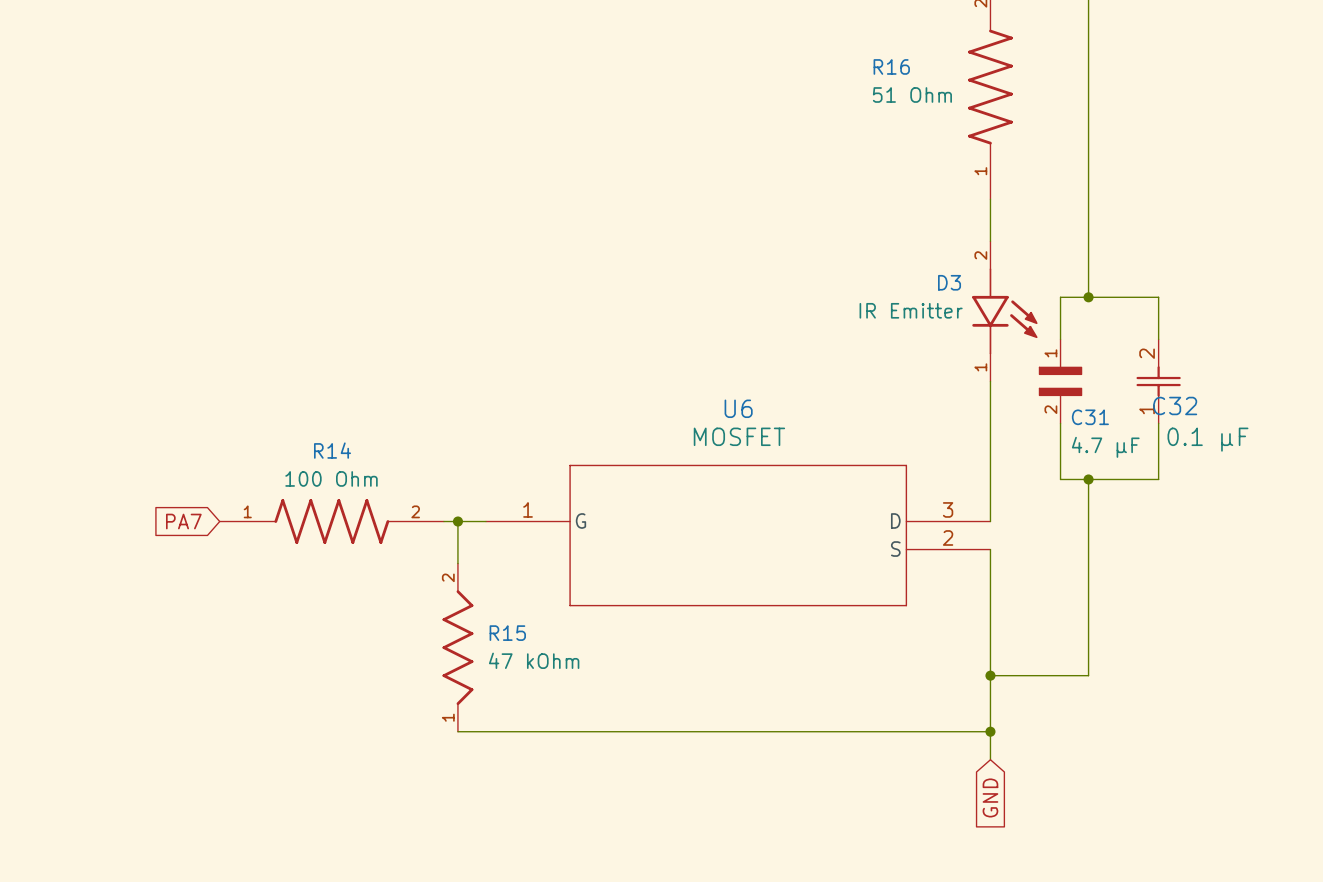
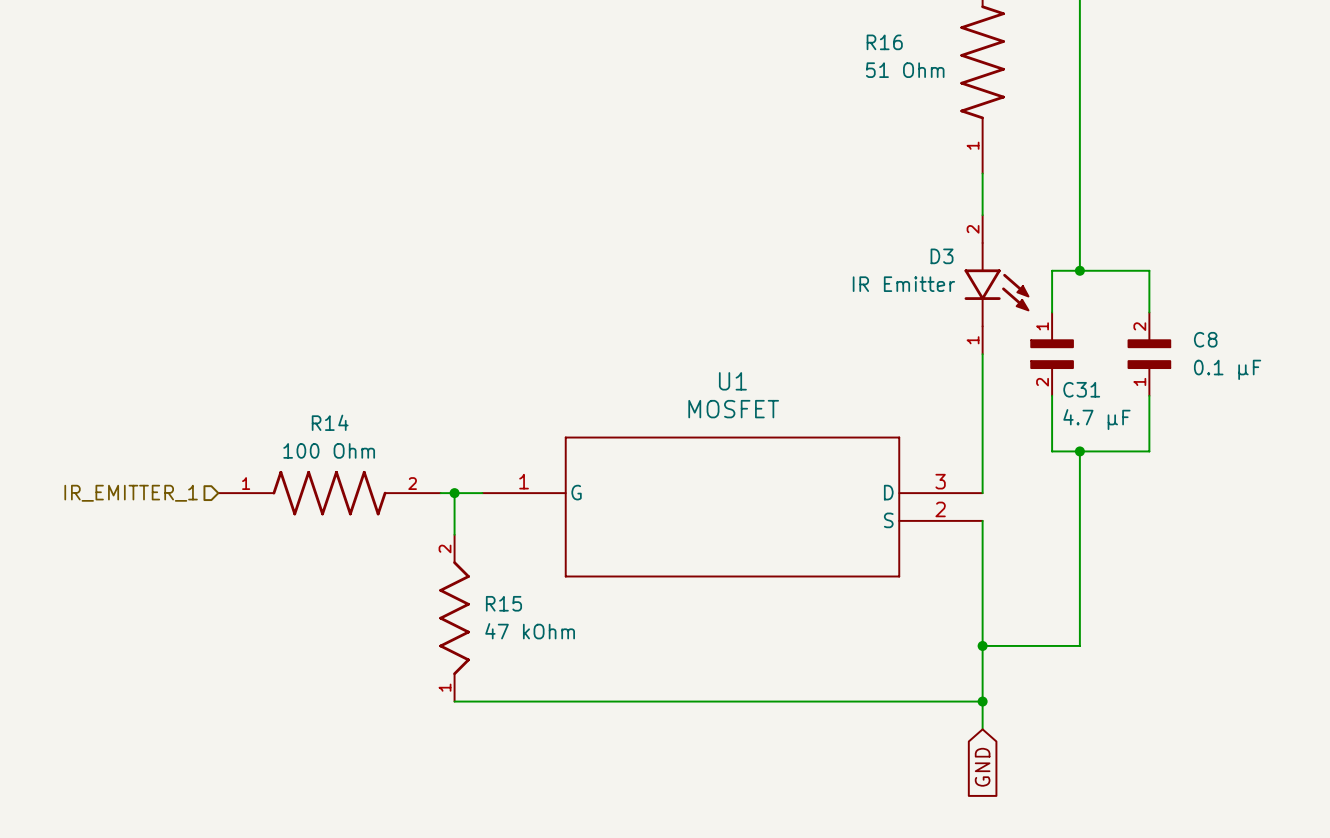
C32: 0.1 µF (1158, 381) -> none
C8: none -> 0.1 µF (1149, 354)
U6 name: U6 (738, 408) -> U1 (732, 381)
hierarchical label: none -> IR_EMITTER_1 (131, 493)
global label: PA7 (183, 521) -> none

